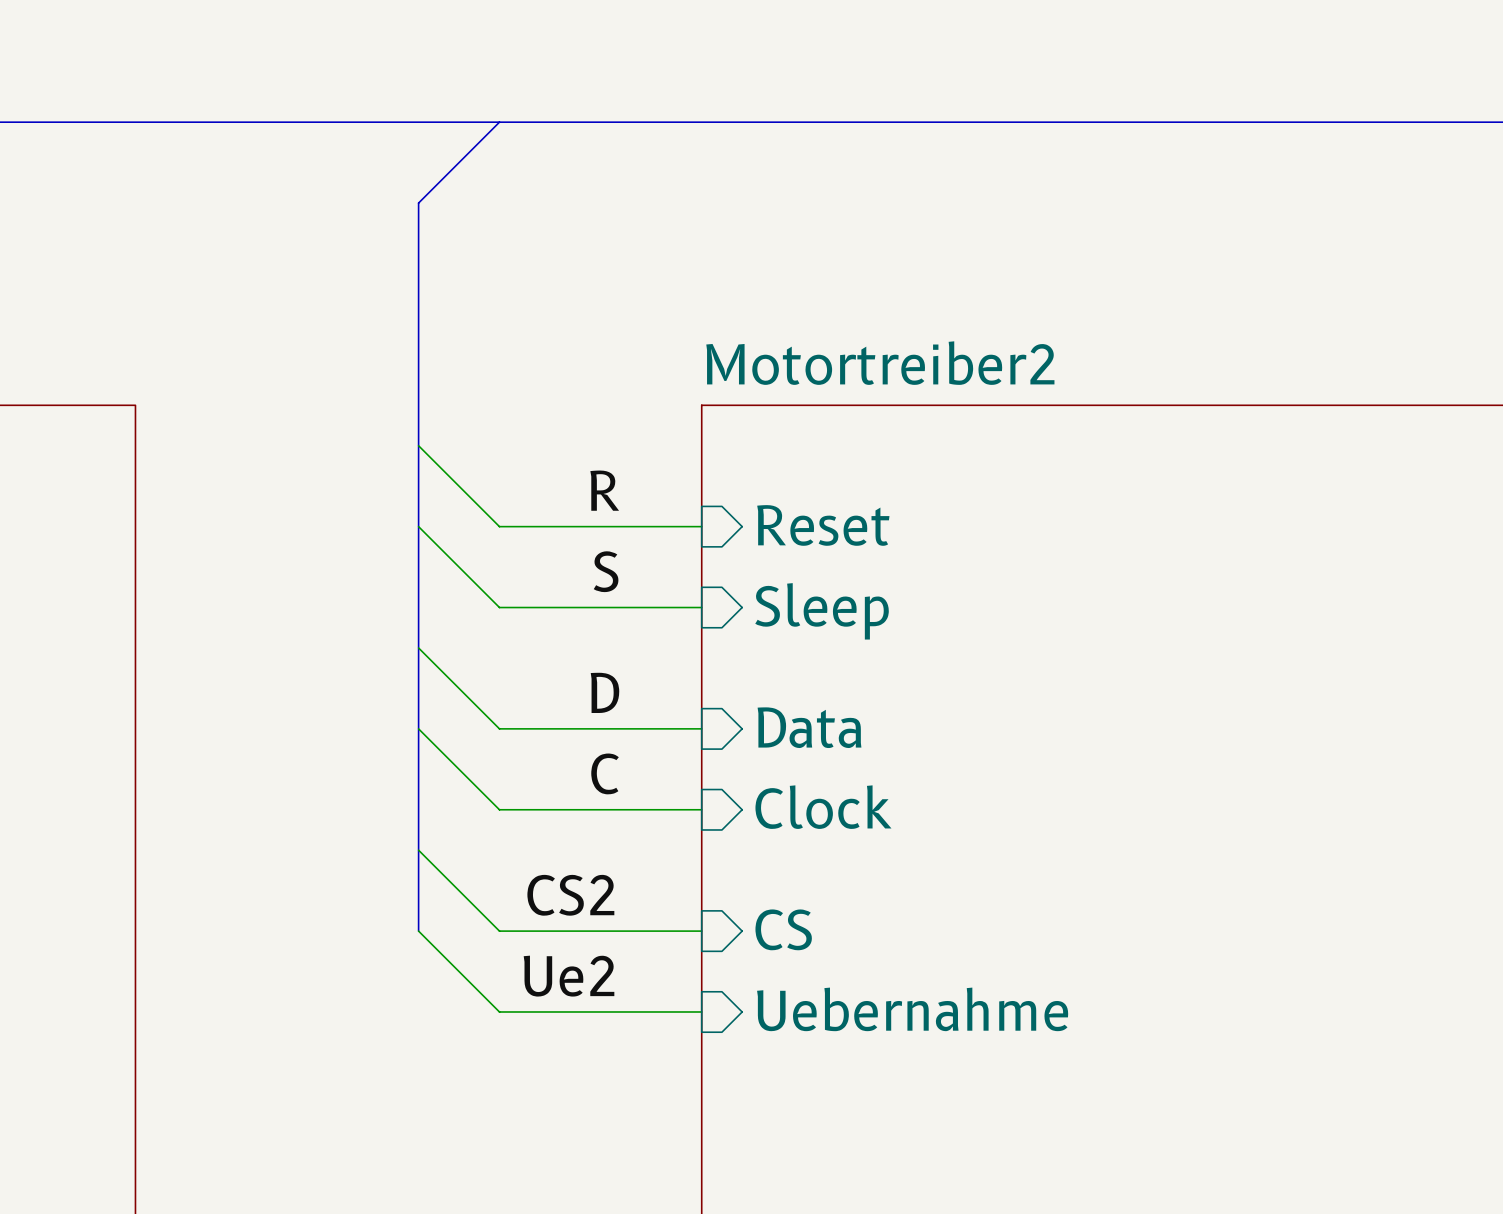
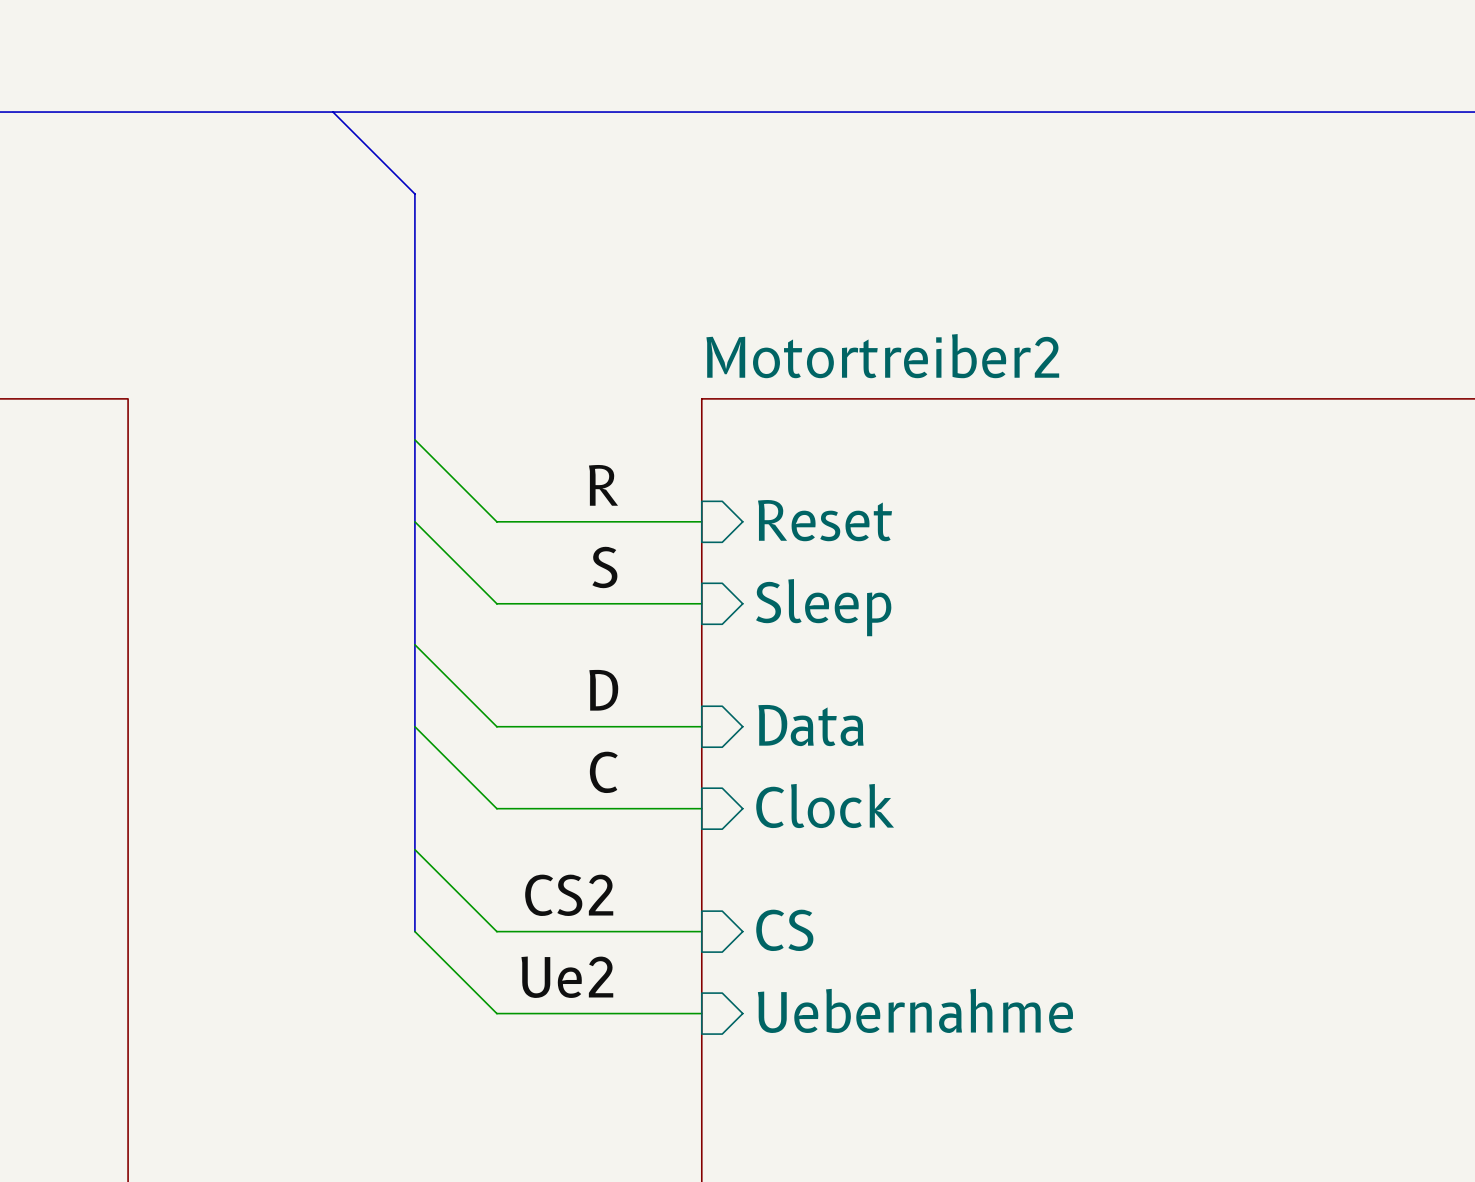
bus: (499, 122) (418, 203) -> (332, 112) (414, 193)

